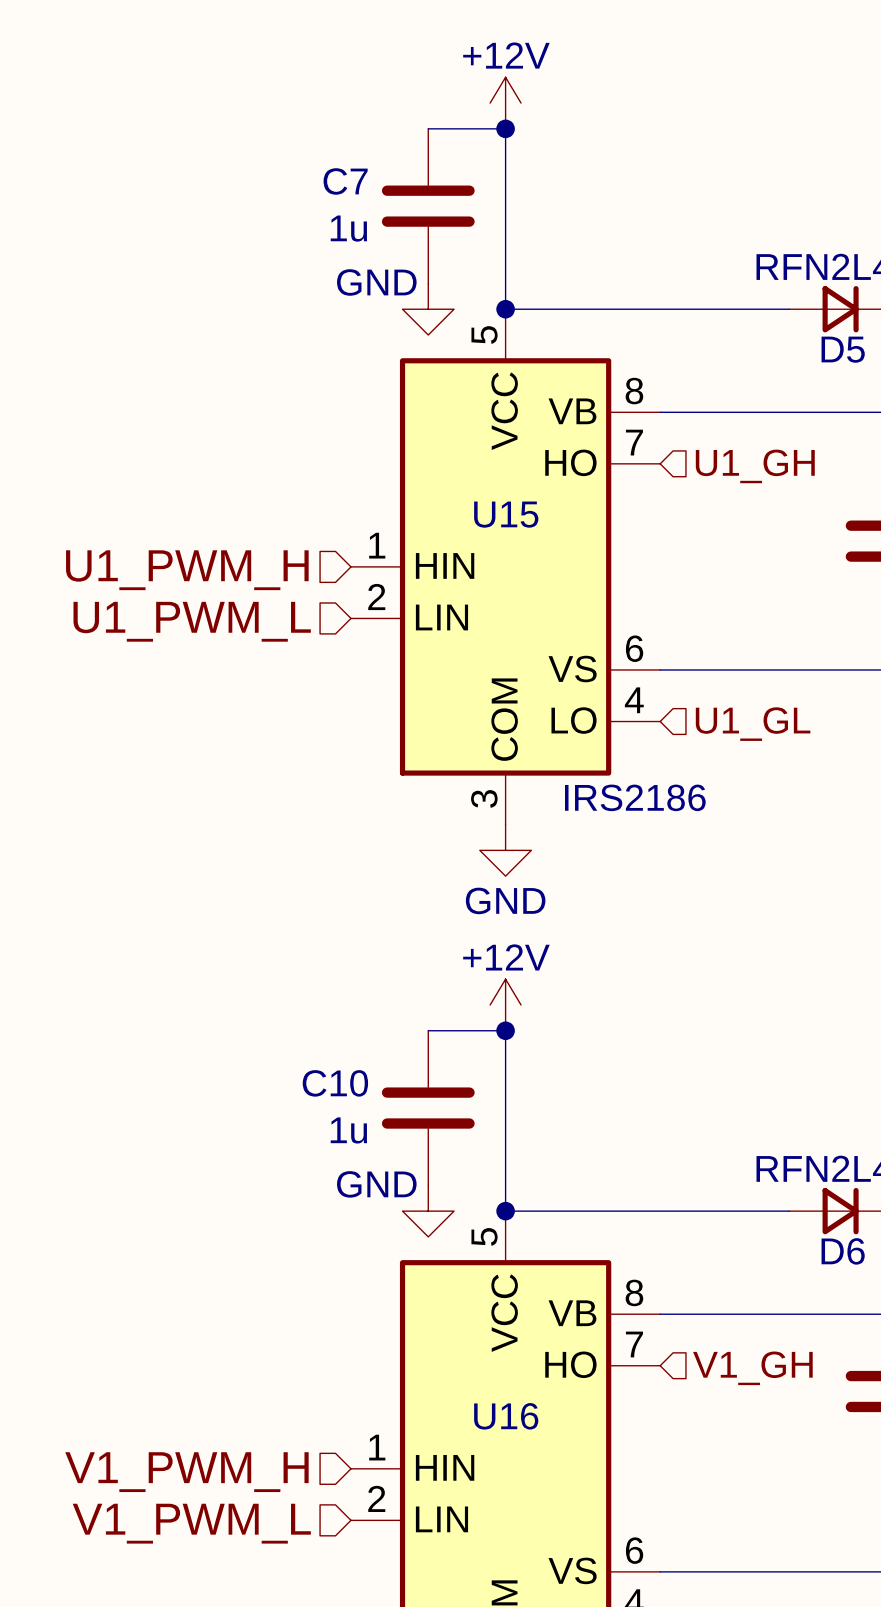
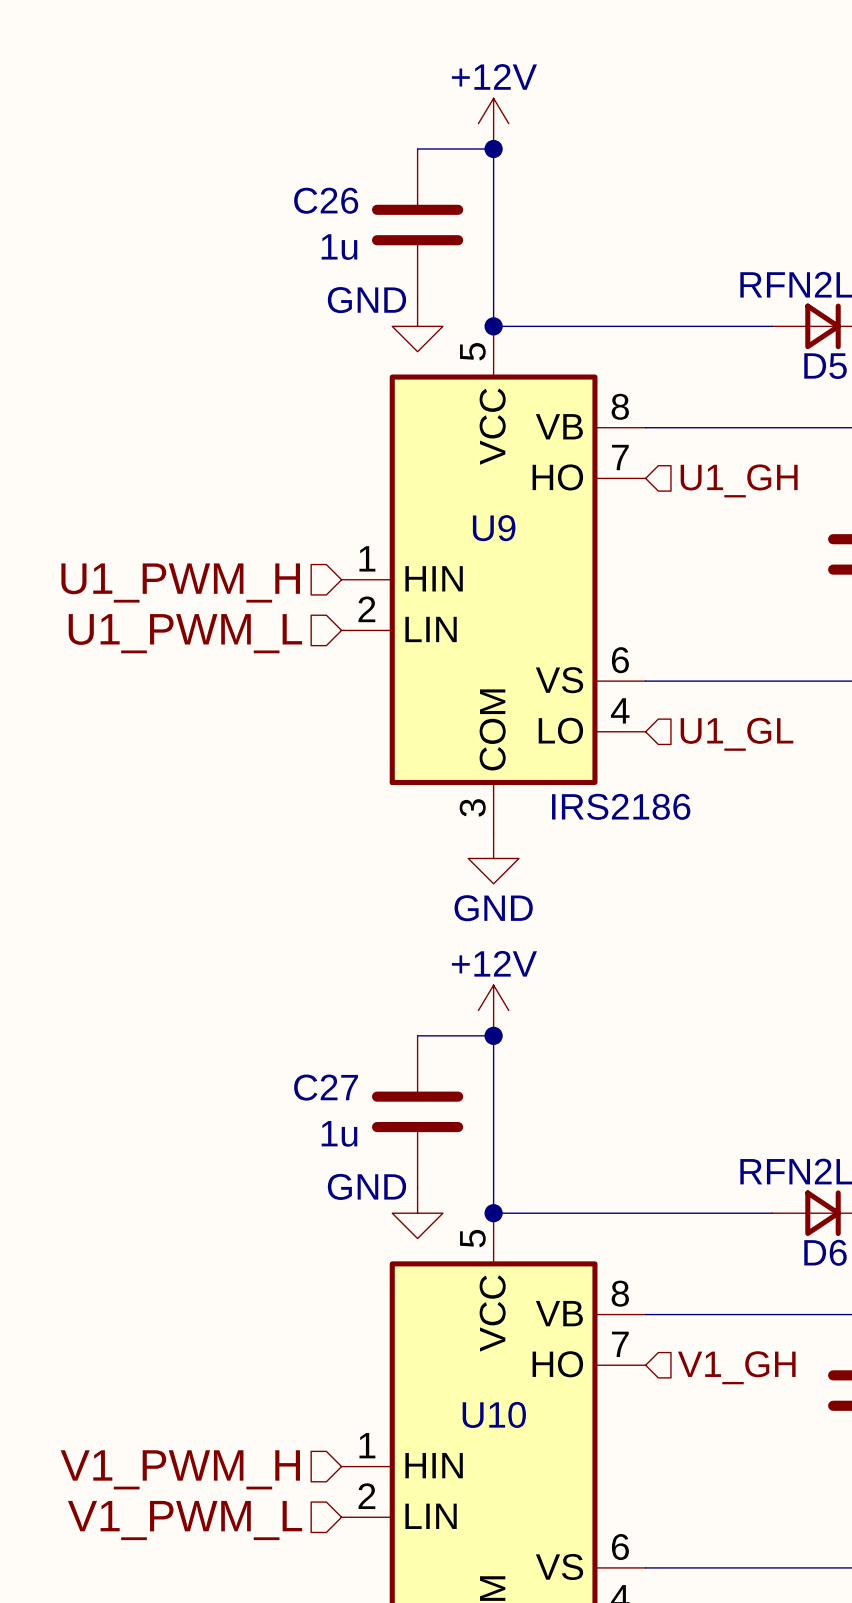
C7 name: C7 (345, 181) -> C26 (326, 200)
U15 name: U15 (506, 514) -> U9 (494, 528)
C10 name: C10 (335, 1083) -> C27 (326, 1087)
U16 name: U16 (506, 1416) -> U10 (494, 1414)

